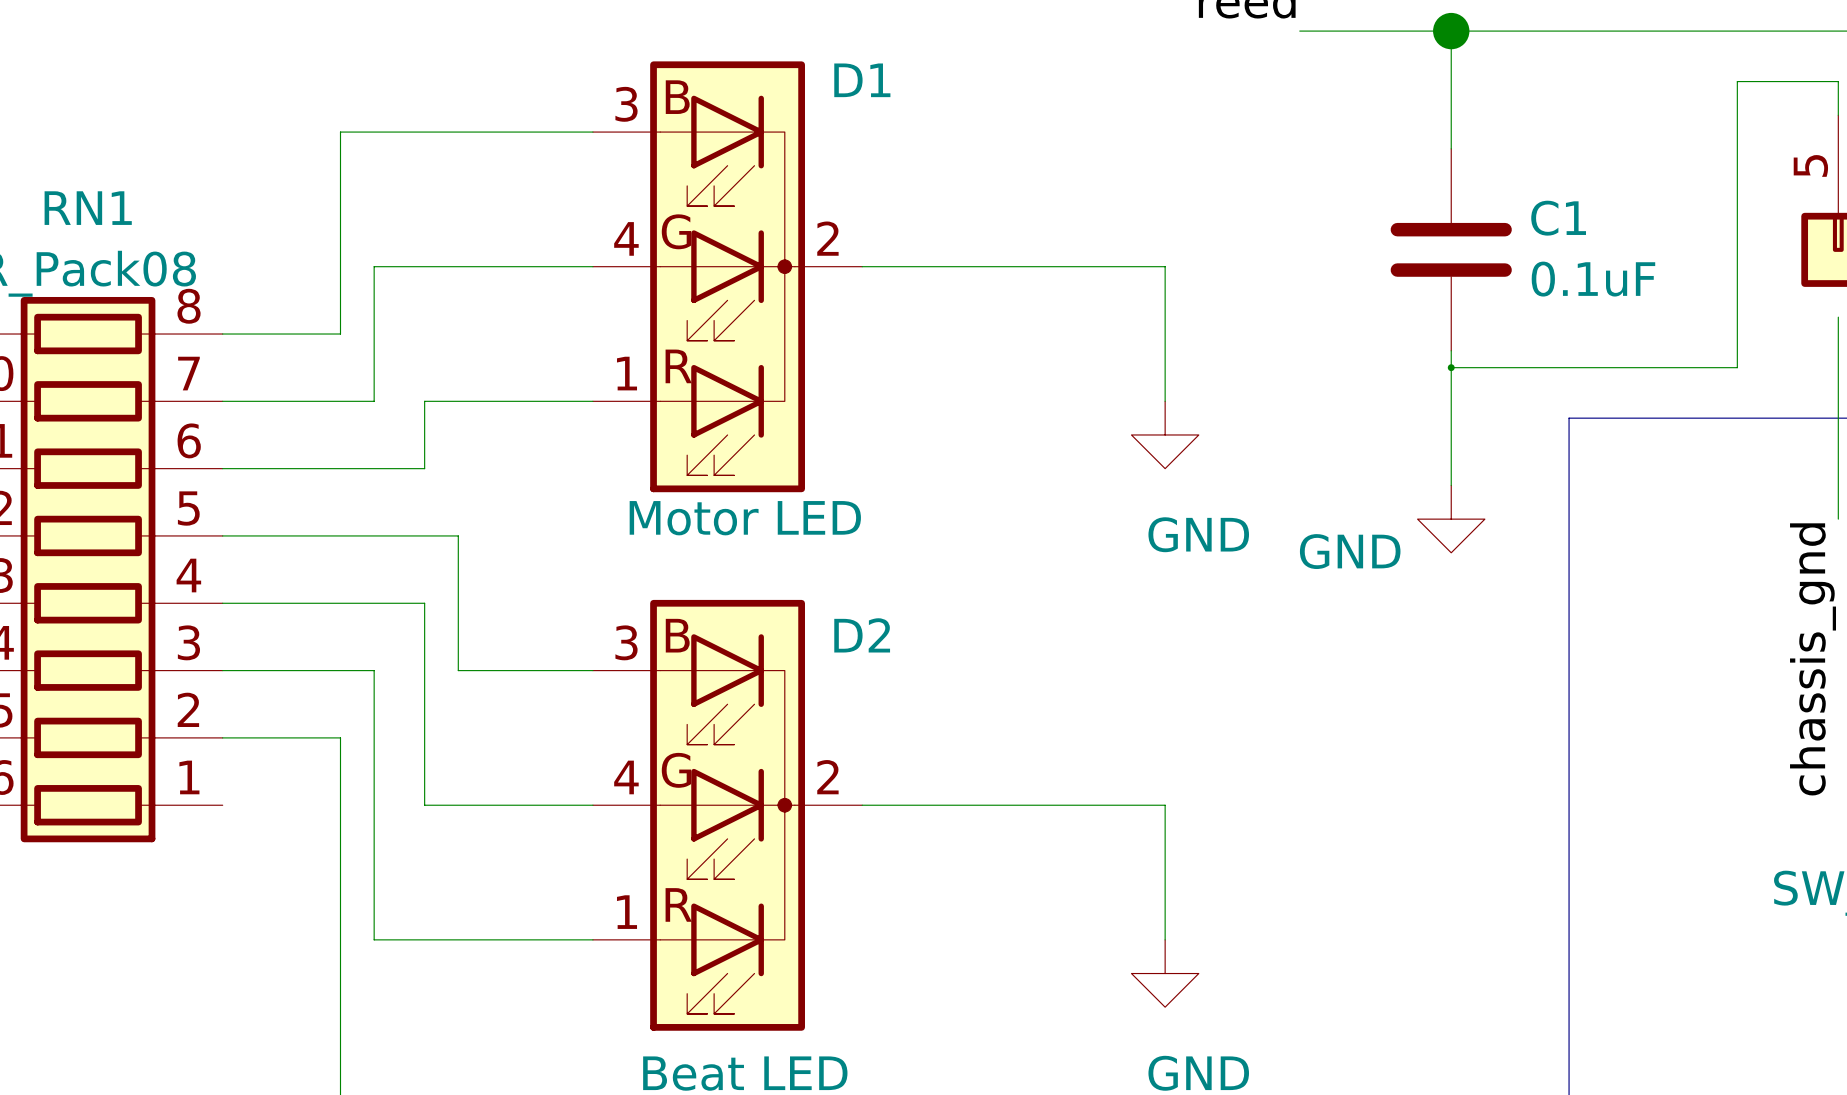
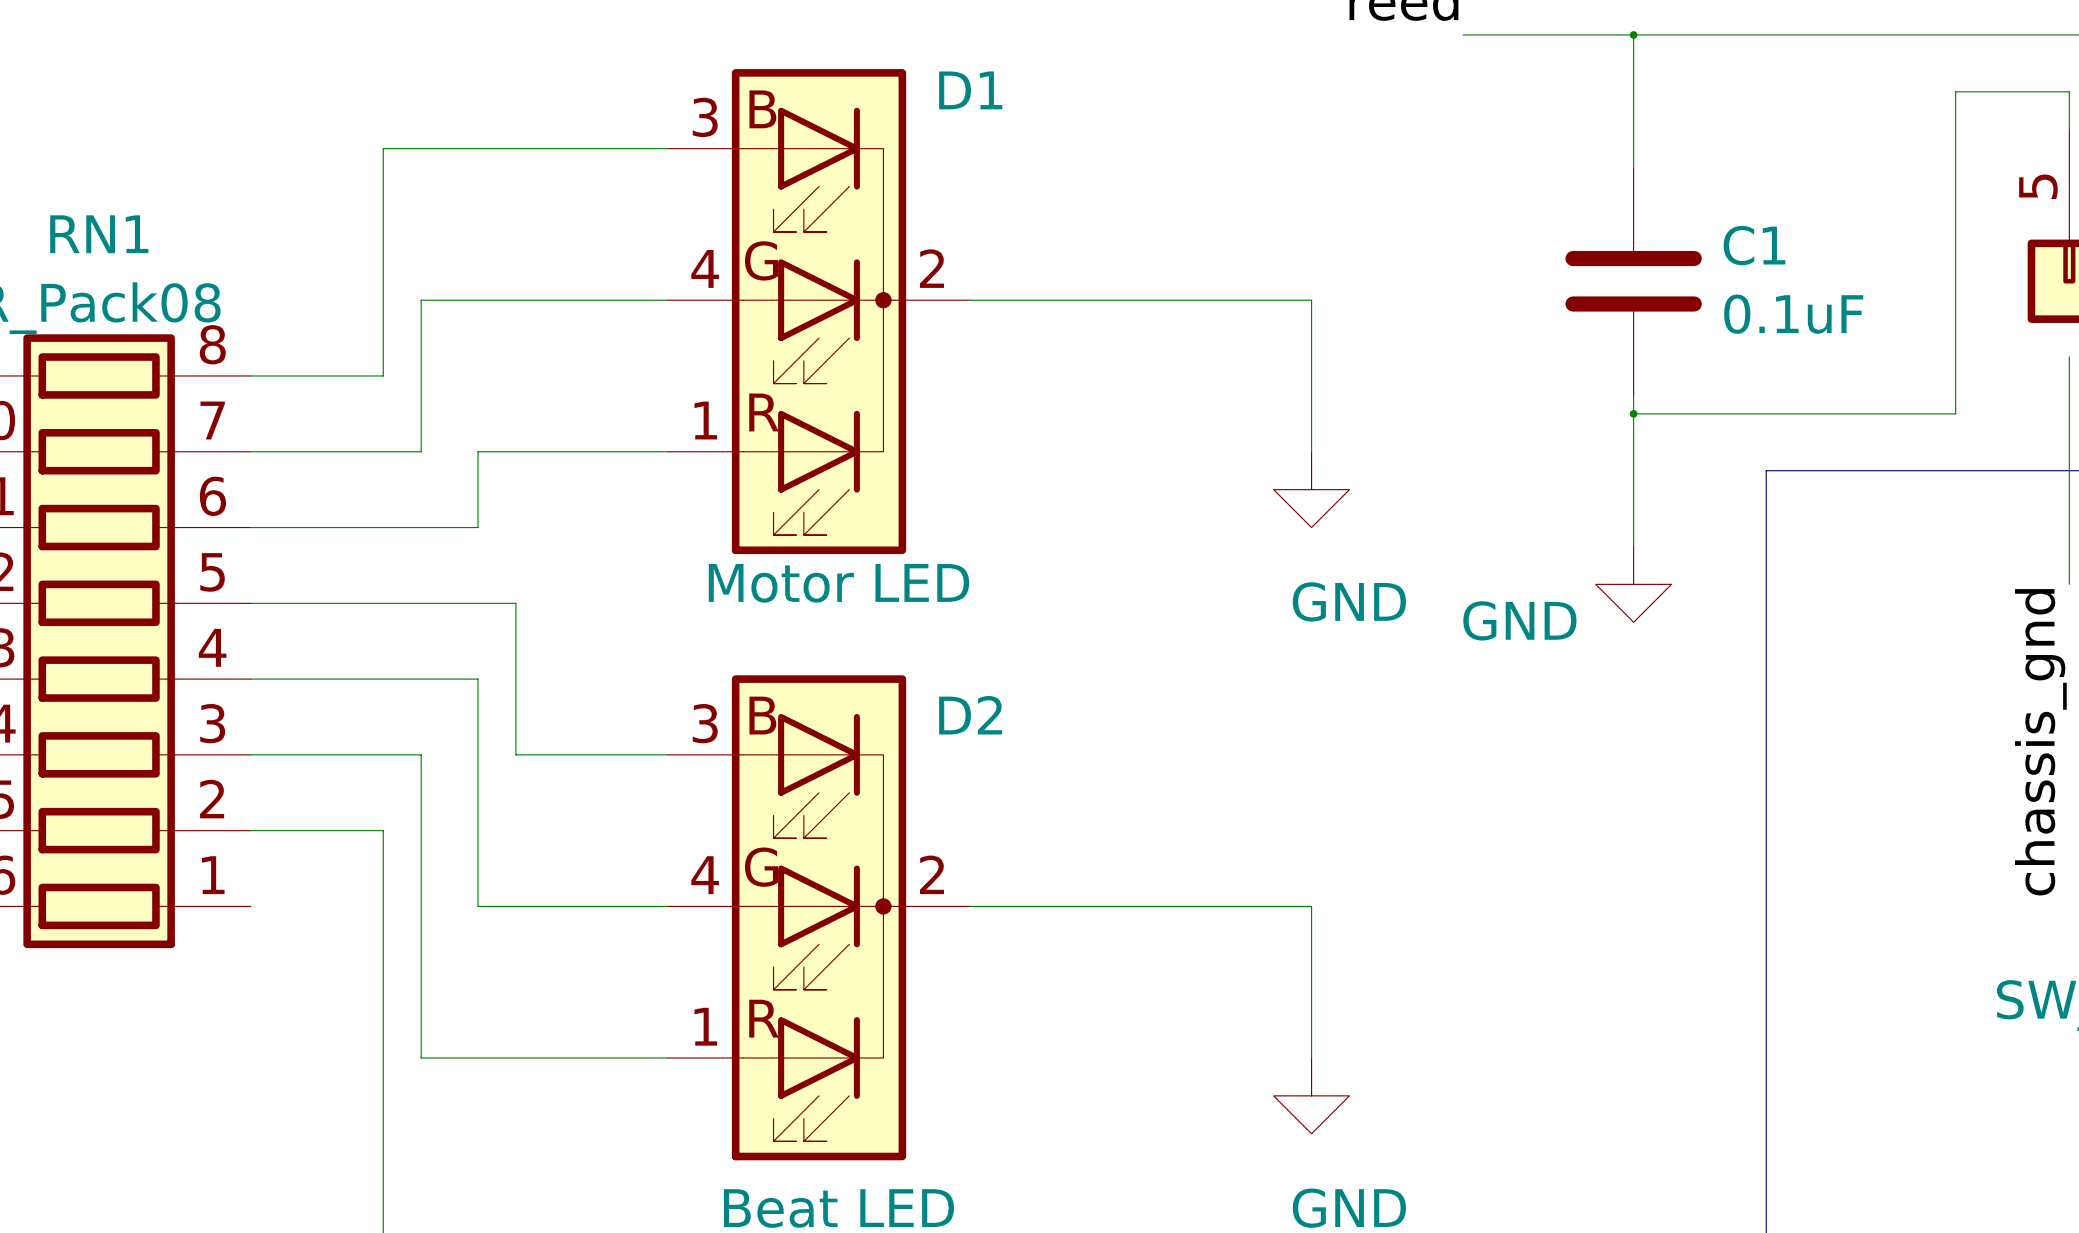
junction size: [1433, 12, 1470, 50] -> [1629, 31, 1638, 39]

